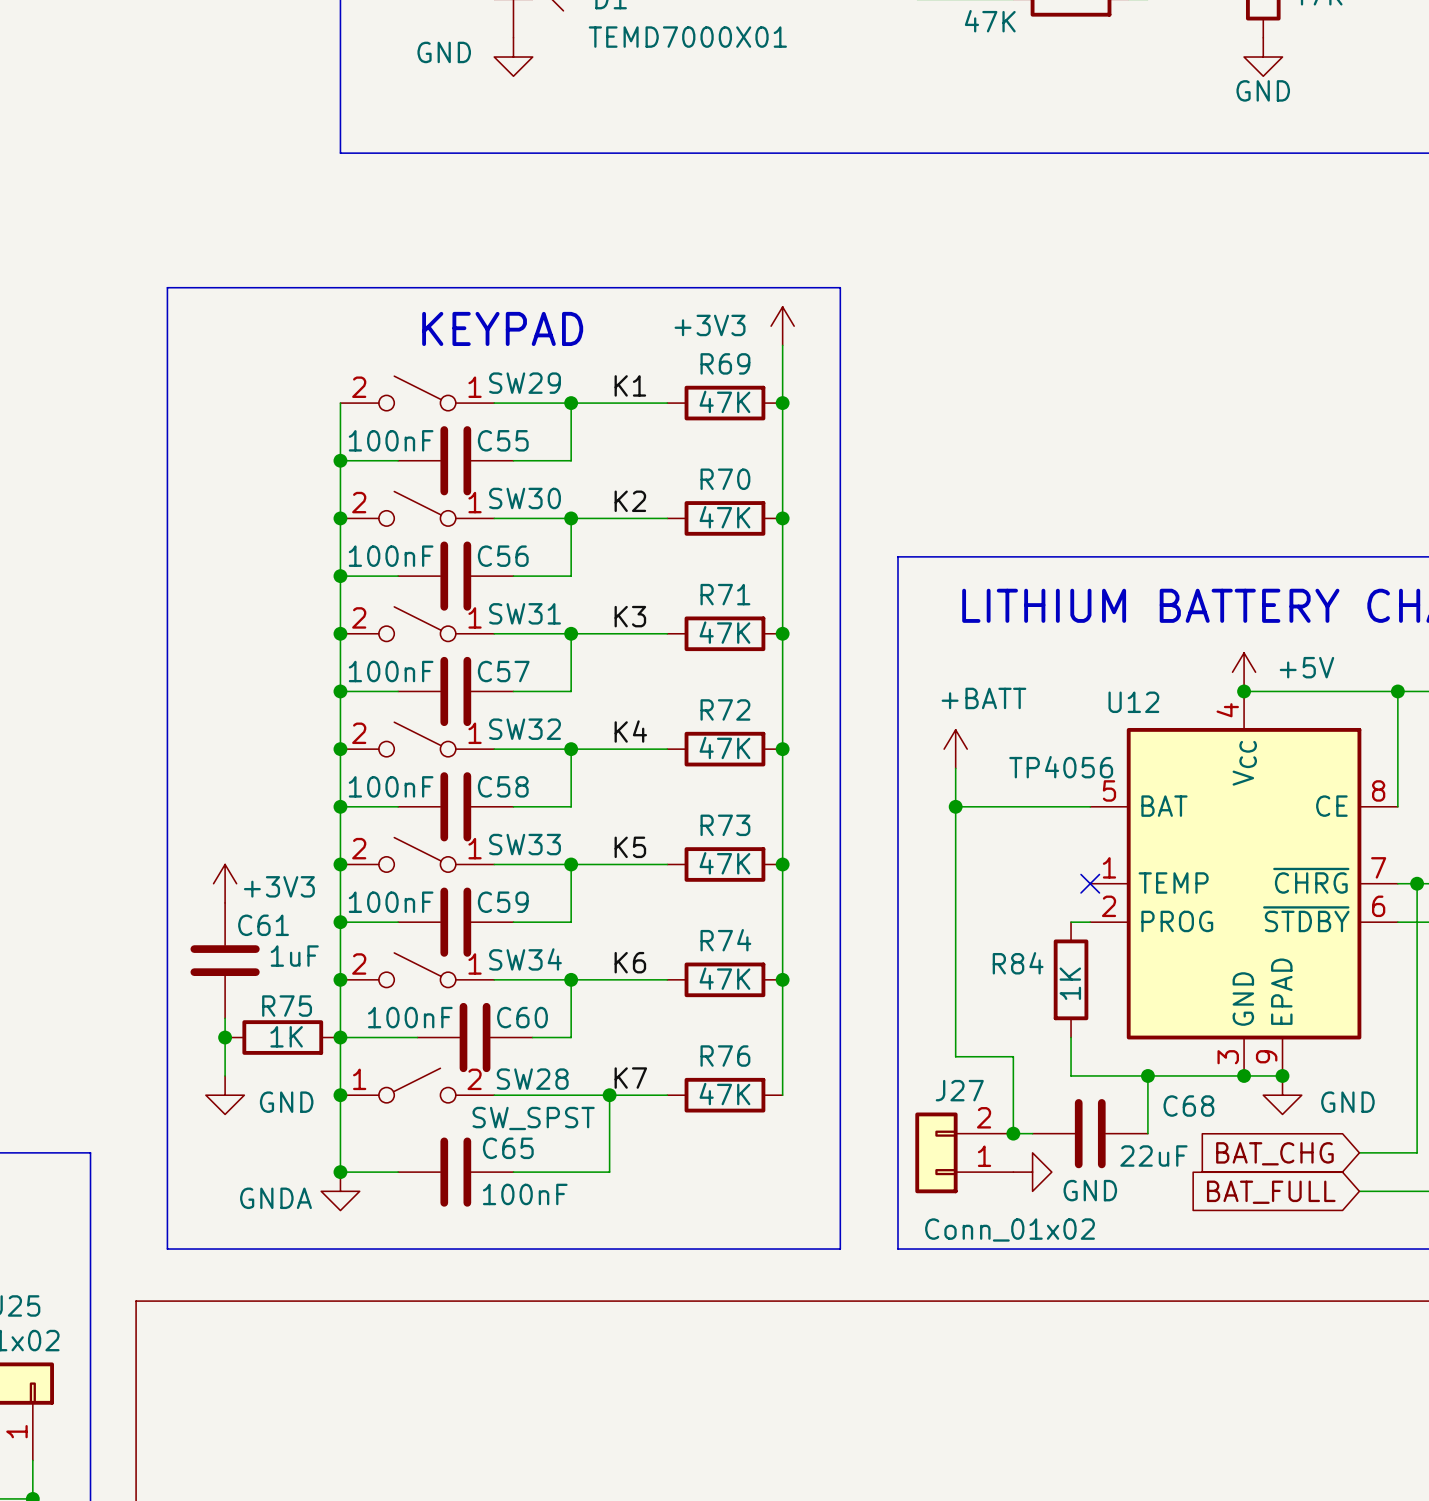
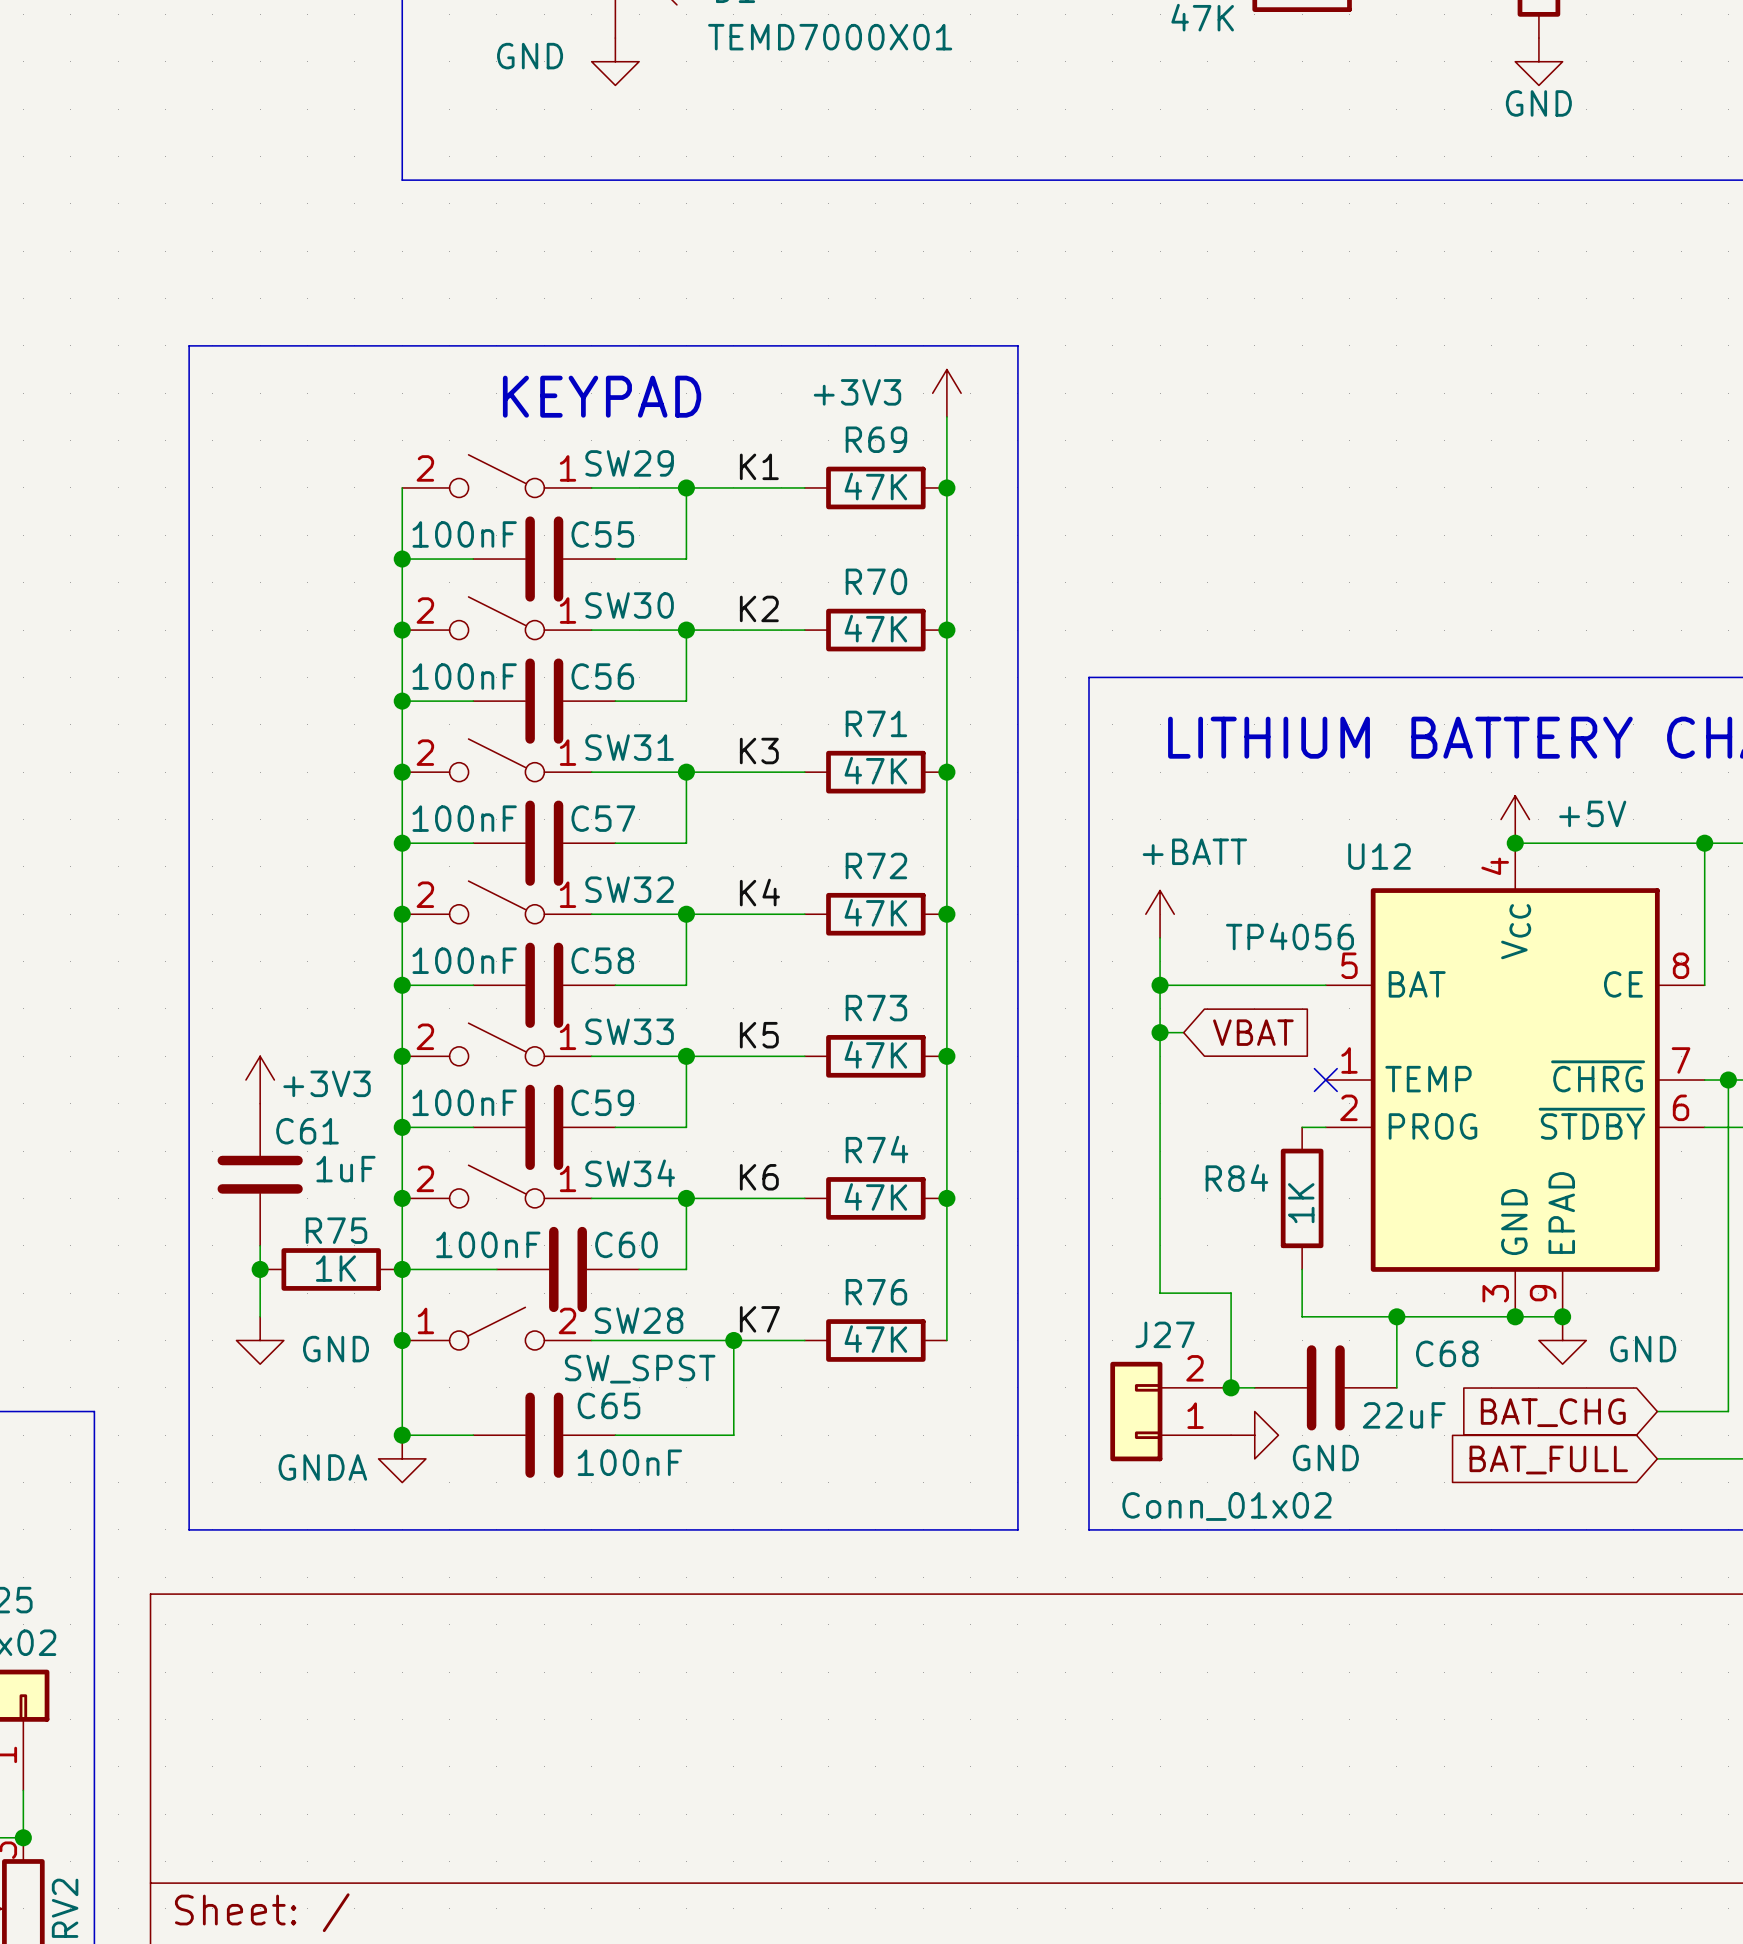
wire: none -> (1160, 1032) (1183, 1032)
junction: none -> (1160, 1032)
global label: none -> VBAT (1253, 1032)

